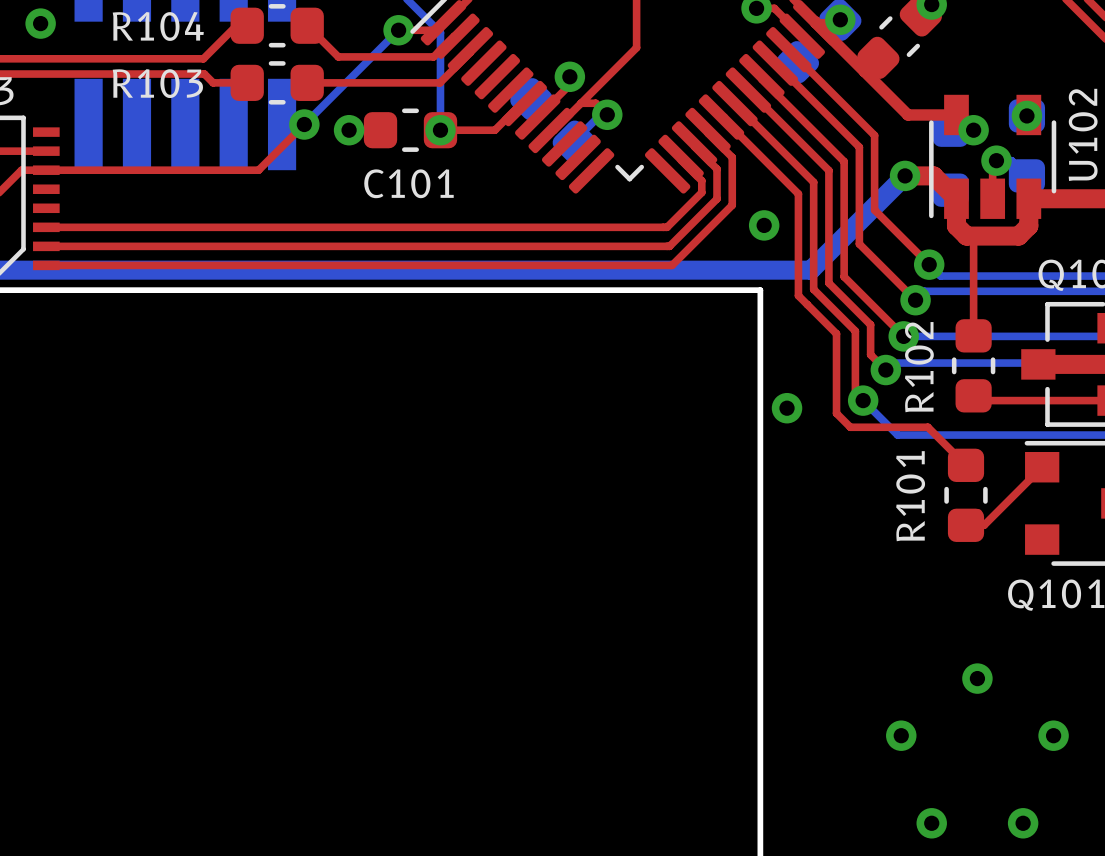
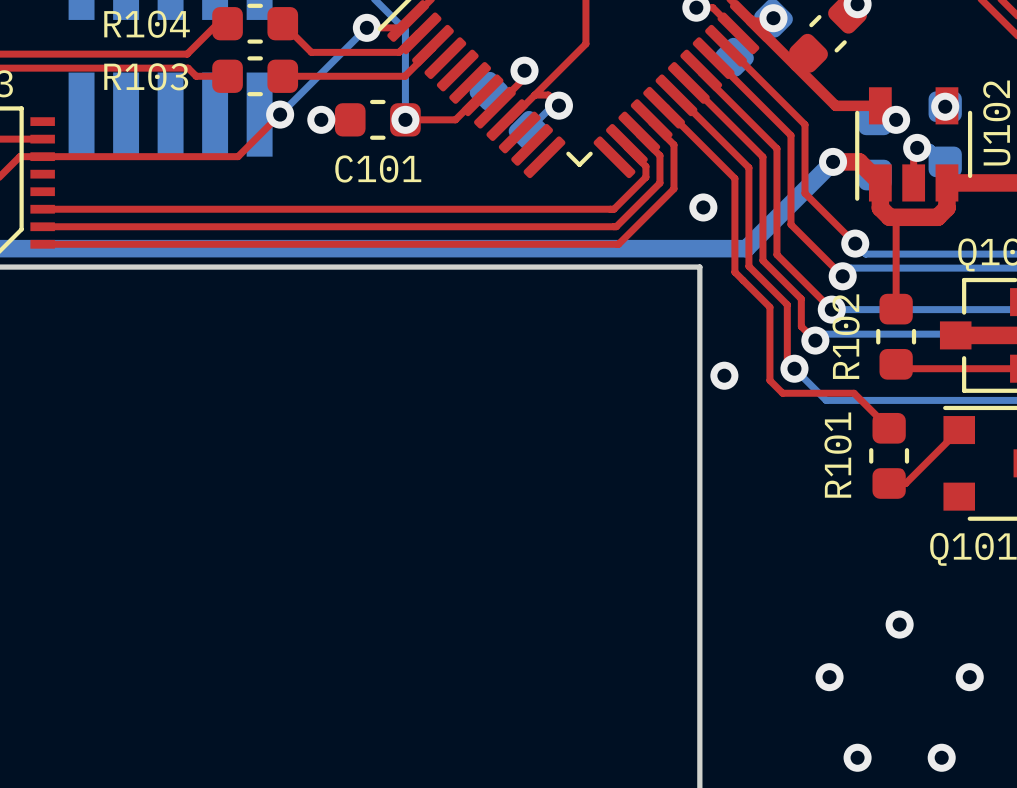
via: (40, 23) -> none

